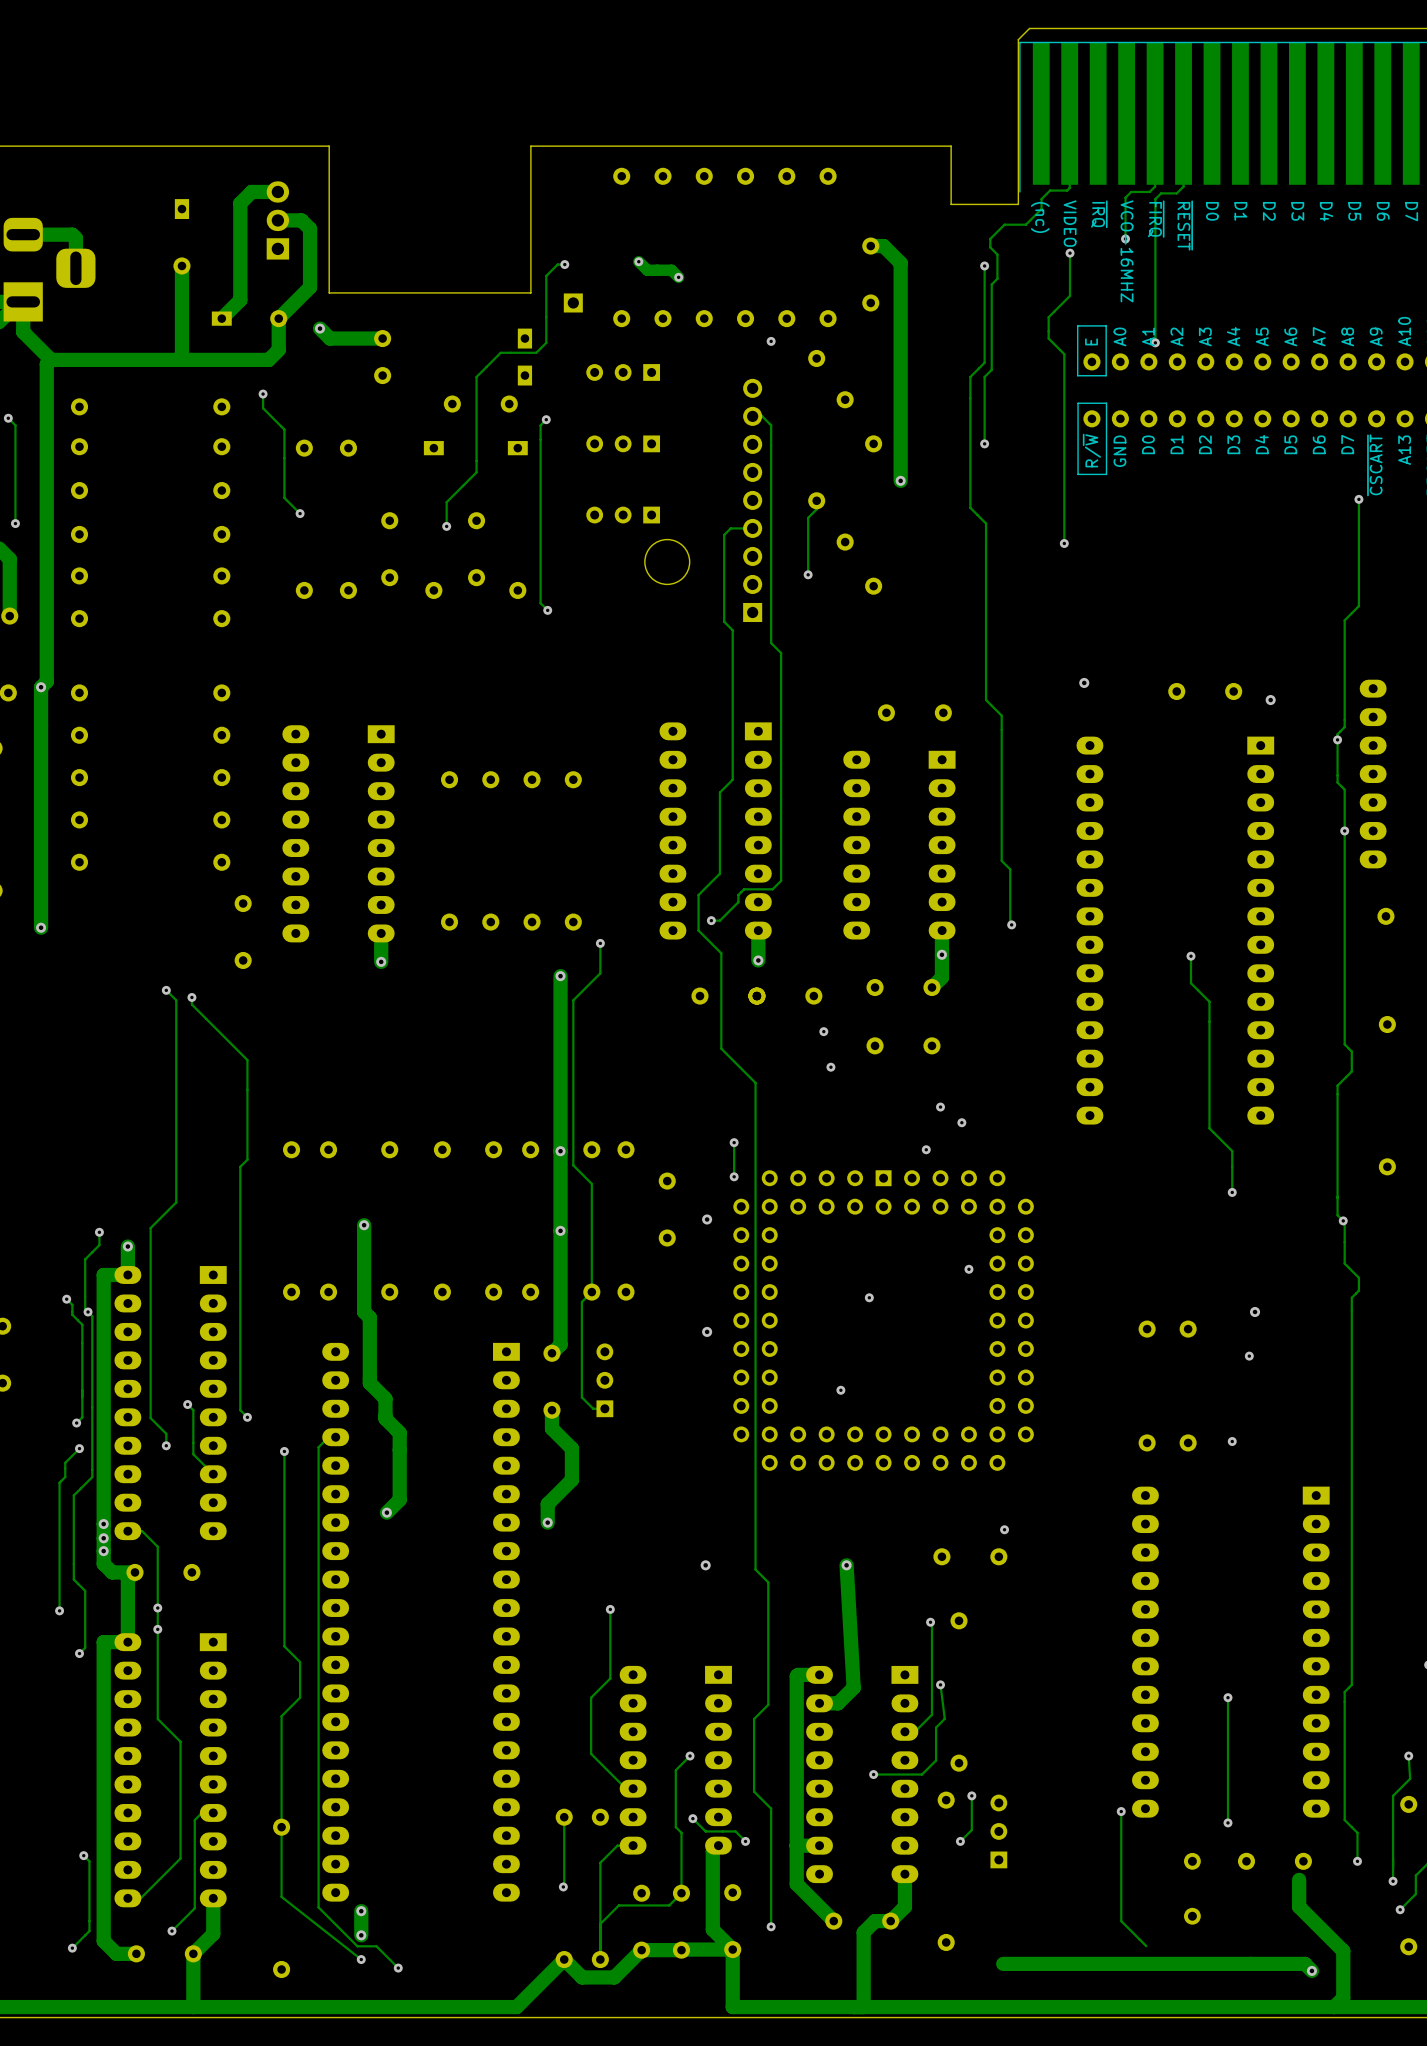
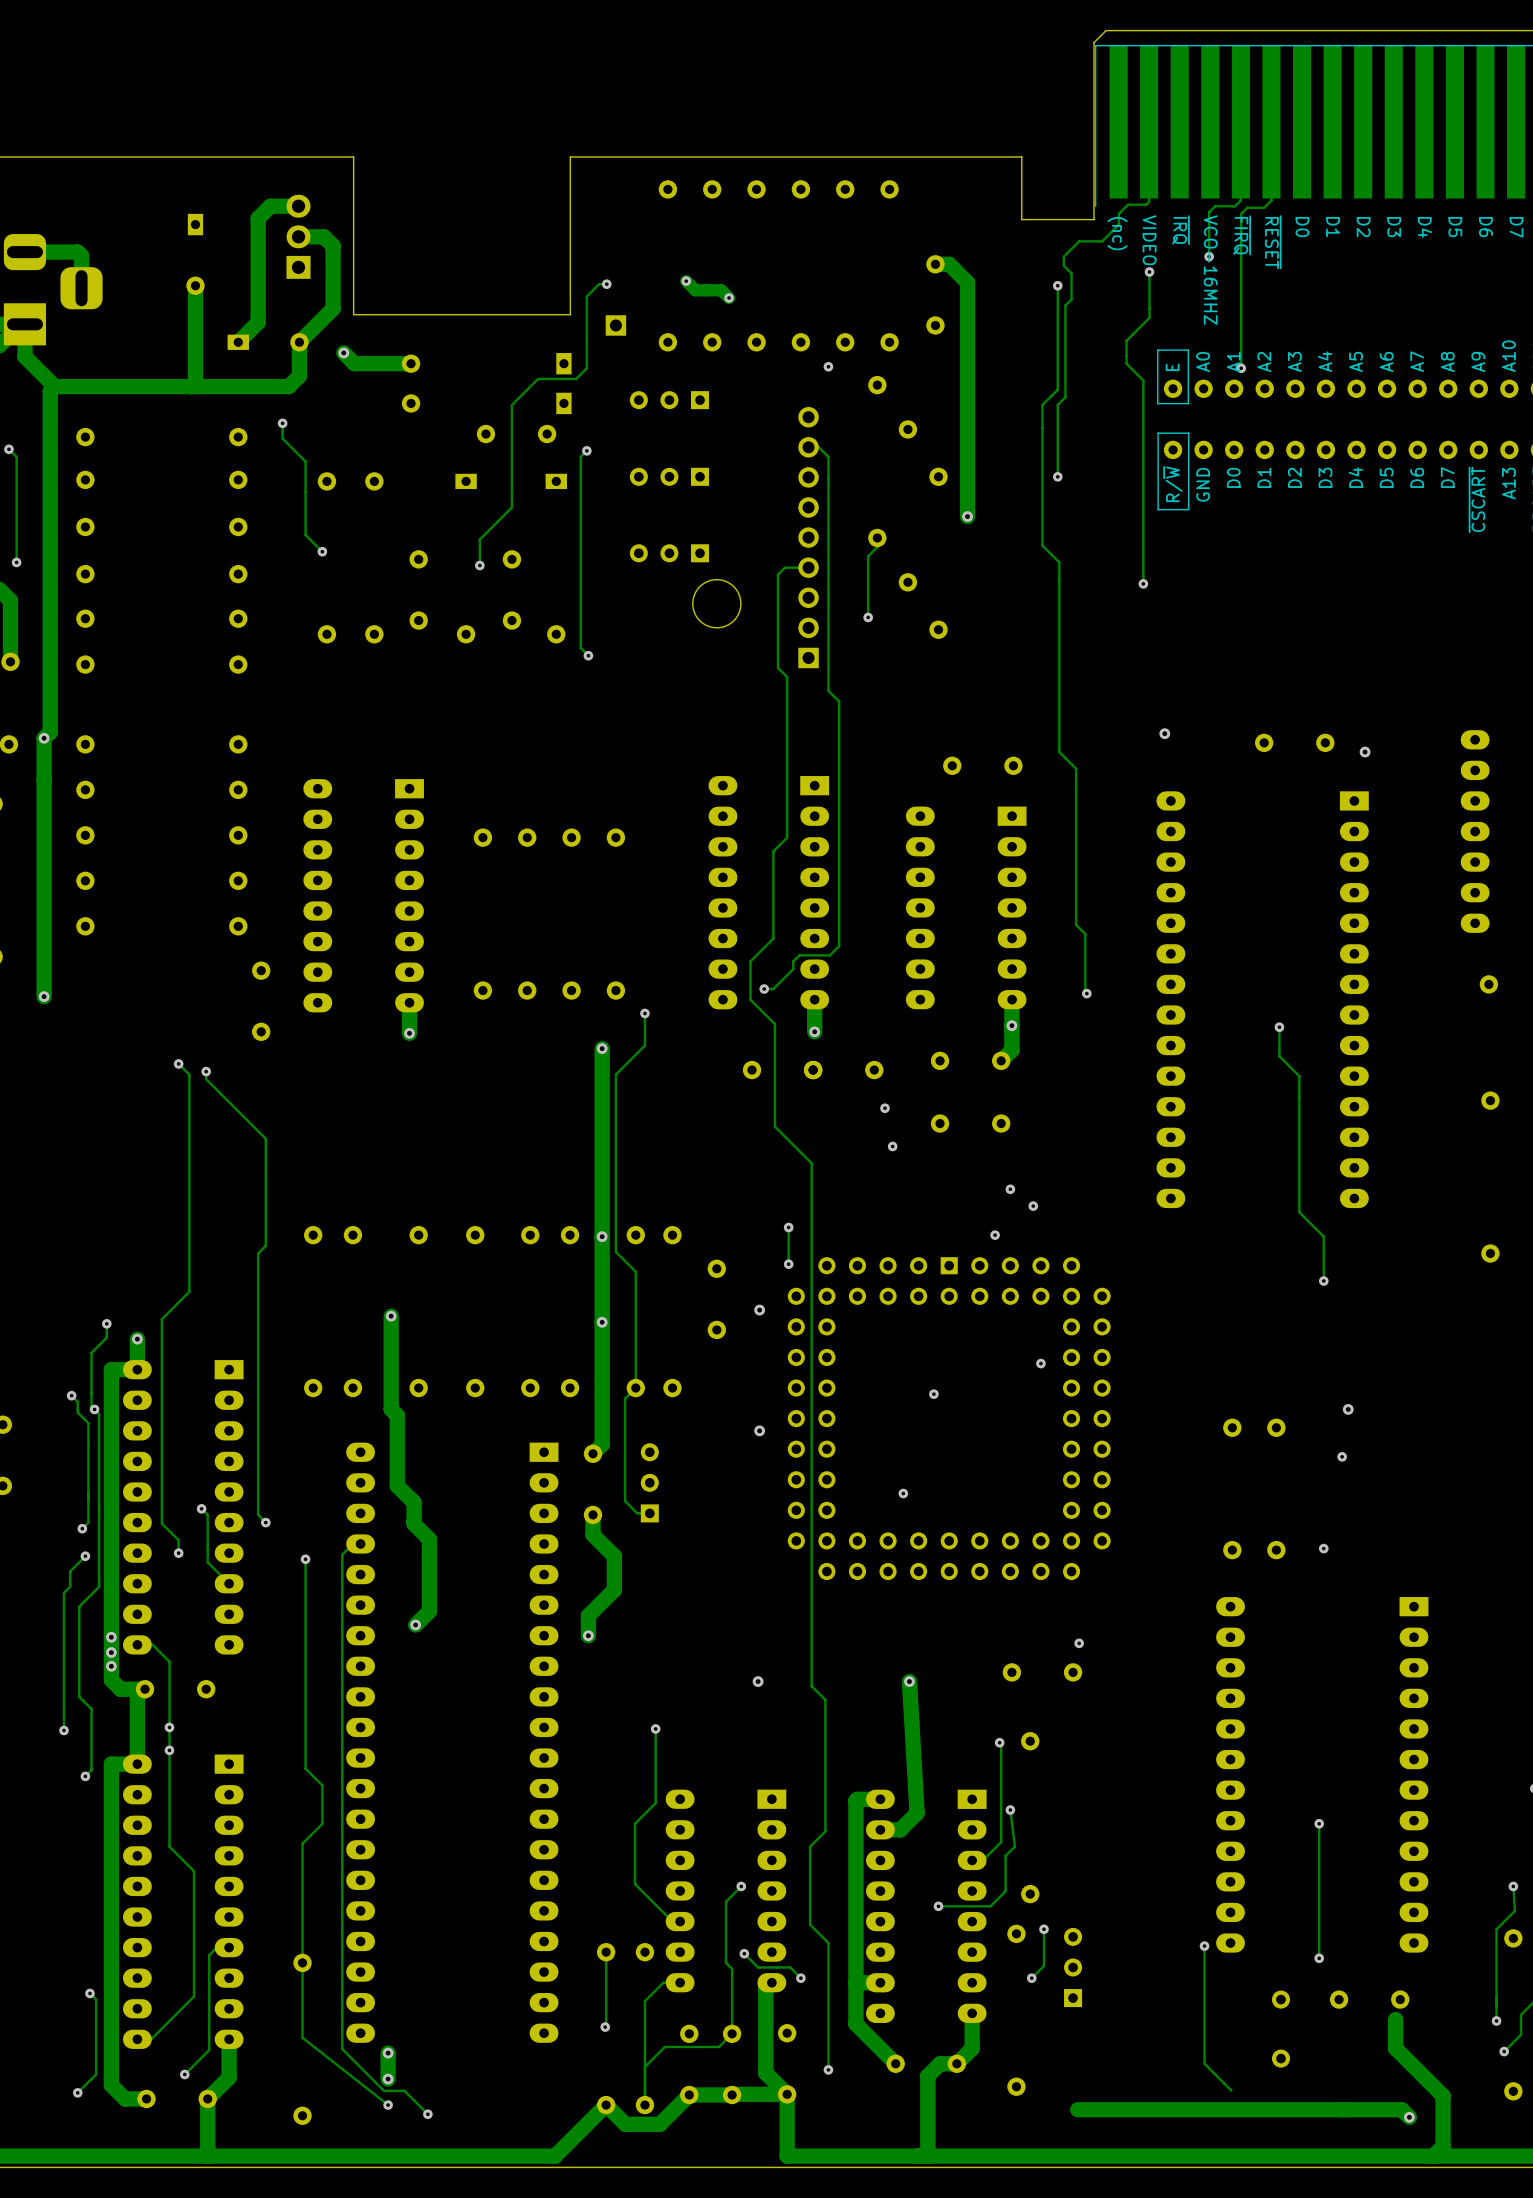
track: (1358, 499) (1358, 606) (1344, 620) (1344, 727) (1337, 734) (1337, 782) (1344, 789) (1344, 1044) (1351, 1051) (1351, 1071) (1337, 1085) (1337, 1215) (1344, 1222) (1344, 1263) (1358, 1277) (1358, 1290) (1351, 1297) (1351, 1684) (1344, 1691) (1344, 1820) (1357, 1832) (1357, 1861) -> none
via: (1358, 499) -> none
via: (1337, 739) -> none
via: (1344, 830) -> none
via: (1343, 1220) -> none
via: (1357, 1861) -> none

